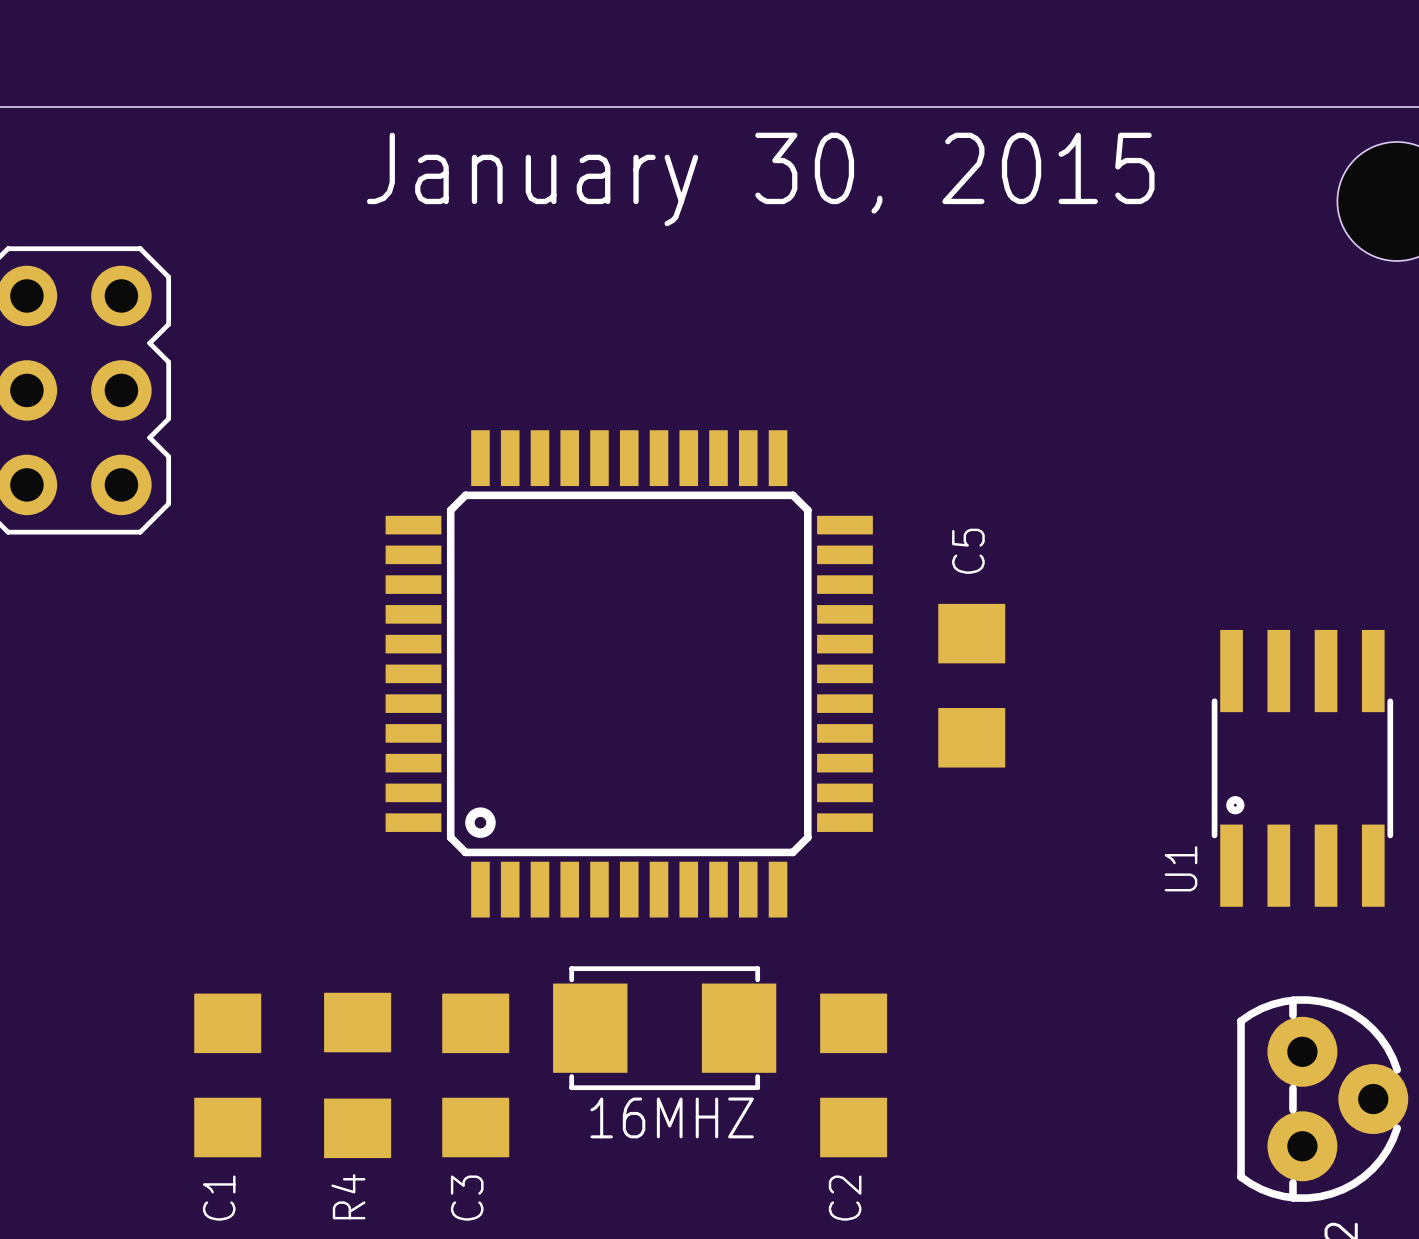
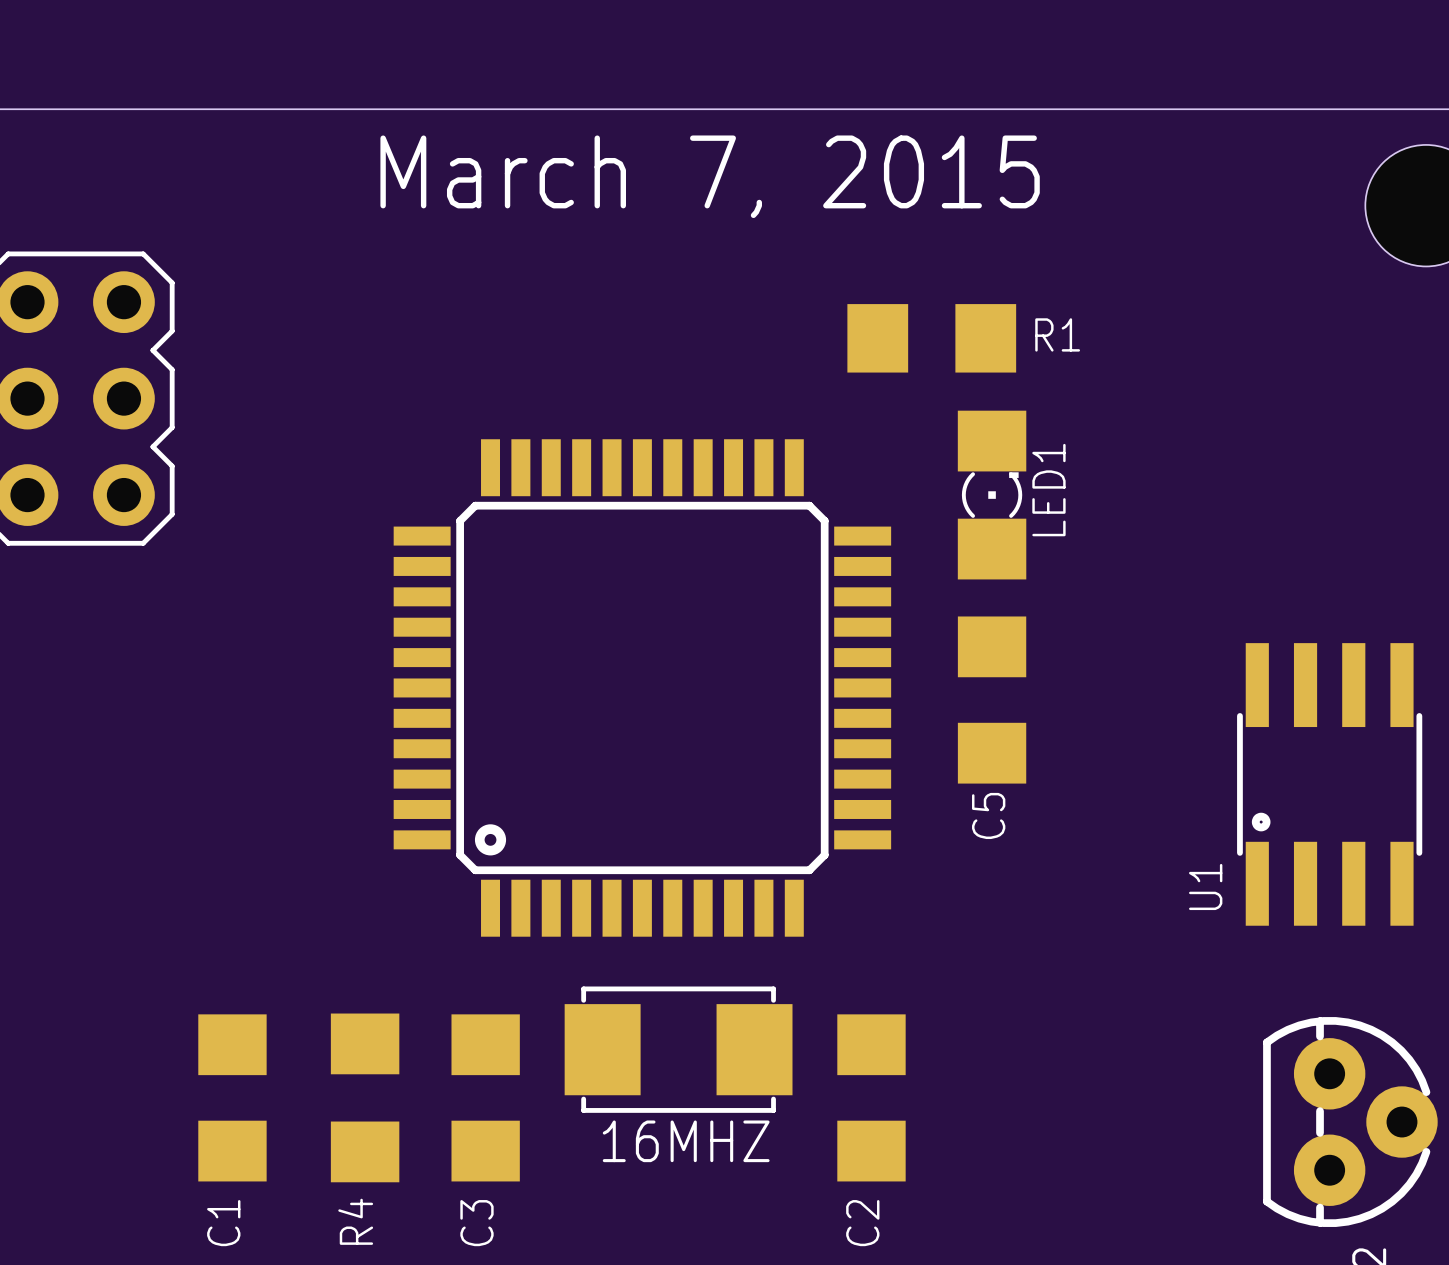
text: January 30, 2015 (760, 179) -> March 7, 2015 (710, 176)
R1: none -> (931, 338)
LED1: none -> (992, 495)
C5 name position: C5 (968, 551) -> C5 (988, 815)

